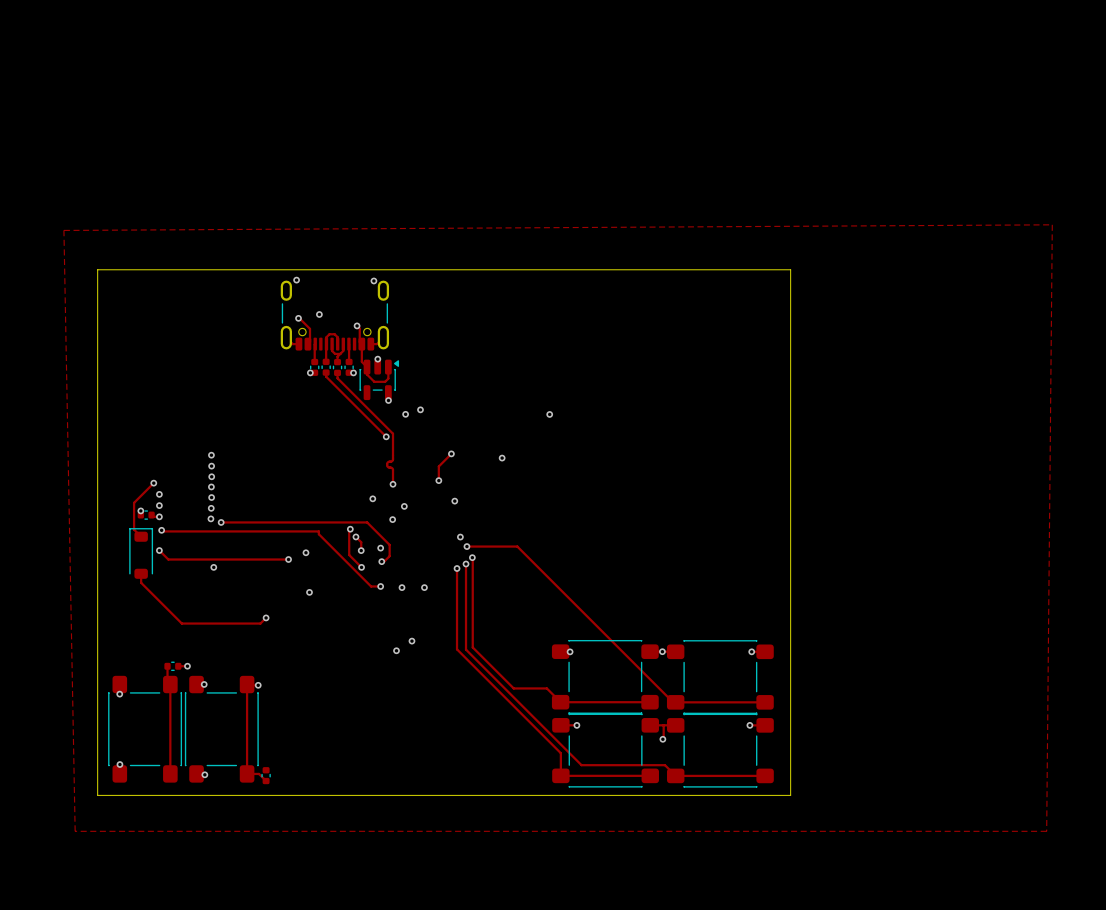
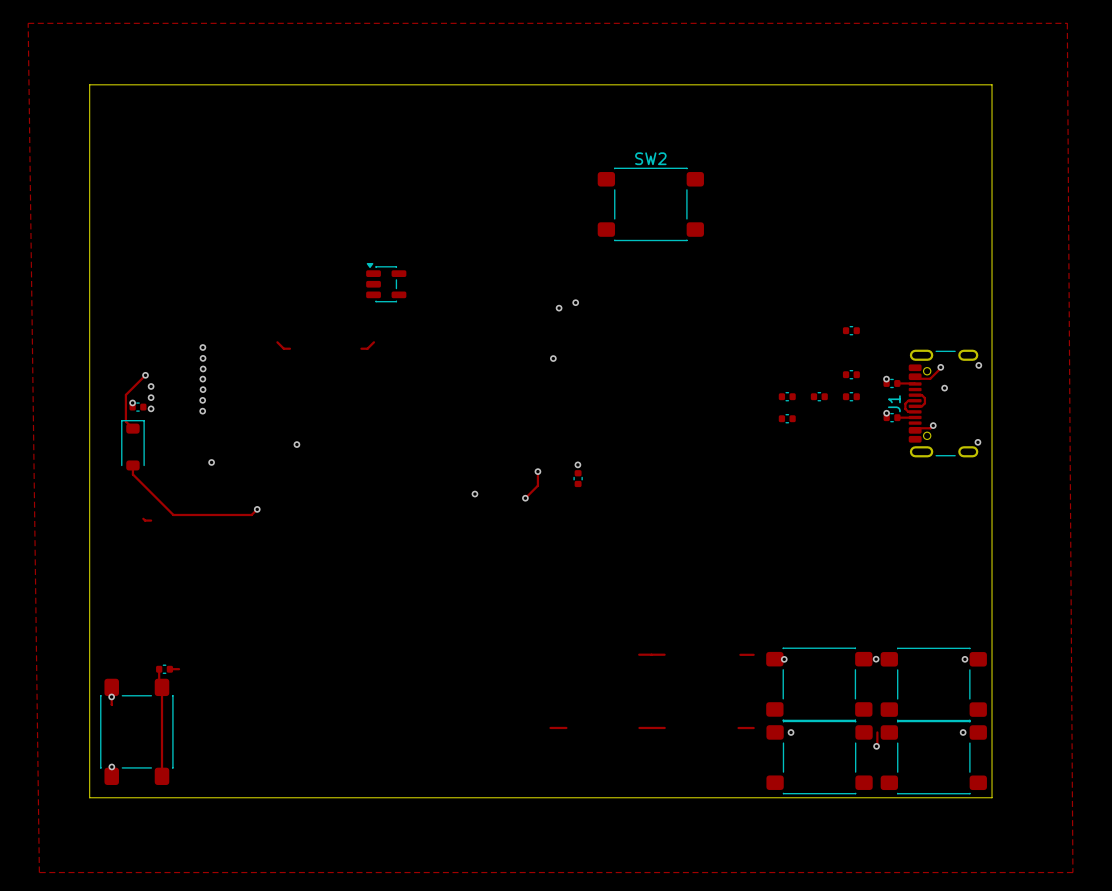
SW2: none -> (650, 204)
zone outline: (1052, 224) (63, 230) (75, 831) (1046, 831) (1052, 224) -> (28, 23) (39, 872) (1072, 872) (1067, 23) (28, 23)
board edge: (97, 269) (790, 269) (790, 795) -> (89, 274) (89, 84) (992, 84) (992, 797) (779, 797)
via: (296, 280) -> none
via: (373, 280) -> none
via: none -> (575, 302)
via: none -> (559, 308)
via: (319, 314) -> none
part: (334, 315) -> none
track: (298, 318) (310, 328) (310, 342) (307, 344) -> none
via: (298, 318) -> none
track: (357, 325) (359, 328) (359, 342) (361, 344) (361, 361) (367, 367) (367, 374) (374, 381) (385, 381) (388, 378) (388, 367) -> none
via: (357, 325) -> none
part: none -> (851, 330)
via: none -> (202, 347)
track: (315, 344) (314, 362) -> none
track: (332, 344) (332, 350) (335, 353) (340, 353) -> none
track: (337, 344) (337, 337) (334, 334) (329, 334) (326, 337) (326, 361) -> none
track: (343, 344) (343, 350) (337, 356) (337, 362) -> none
track: (348, 344) (349, 361) -> none
via: none -> (203, 358)
via: none -> (553, 358)
via: (377, 359) -> none
via: none -> (978, 365)
track: none -> (940, 367) (930, 378) (917, 378) (915, 376)
via: none -> (940, 367)
via: none -> (203, 368)
part: (314, 367) -> none
part: (326, 367) -> none
part: (337, 367) -> none
part: (349, 367) -> none
via: none -> (145, 375)
part: none -> (851, 374)
via: (310, 372) -> none
track: (326, 372) (326, 376) (386, 436) -> none
track: (337, 372) (337, 378) (393, 433) (392, 459) (387, 464) (387, 466) (392, 469) (393, 484) -> none
via: (353, 372) -> none
via: none -> (202, 379)
via: none -> (886, 379)
part rotation: 0° (379, 379) -> 90° counterclockwise (386, 282)
part position: (379, 379) -> (386, 282)
part: none -> (891, 383)
track: none -> (897, 383) (915, 383)
via: none -> (151, 386)
via: none -> (944, 388)
via: none -> (203, 389)
track: none -> (915, 395) (921, 395) (924, 398) (924, 403) (921, 406) (915, 406)
part: none -> (787, 396)
part: none -> (819, 396)
part: none -> (851, 396)
via: none -> (151, 397)
via: none -> (202, 400)
track: none -> (915, 400) (908, 400) (905, 403) (905, 408) (908, 411) (915, 411)
via: none -> (132, 402)
J1: none -> (943, 403)
via: (388, 400) -> none
part: none -> (137, 407)
via: none -> (151, 408)
via: none -> (202, 411)
via: none -> (886, 413)
via: (420, 409) -> none
part: none -> (892, 417)
track: none -> (915, 417) (897, 417)
via: (405, 414) -> none
via: (549, 414) -> none
part: none -> (787, 418)
track: none -> (933, 425) (930, 428) (917, 428) (915, 430)
via: none -> (933, 425)
via: (386, 436) -> none
via: none -> (977, 442)
via: none -> (296, 444)
track: (451, 453) (438, 466) (438, 480) -> none
via: (451, 453) -> none
via: (211, 455) -> none
via: none -> (211, 462)
via: (502, 458) -> none
via: none -> (577, 464)
via: (211, 466) -> none
track: none -> (537, 471) (537, 485) (525, 498)
via: none -> (537, 471)
part: none -> (578, 478)
via: (211, 476) -> none
via: (438, 480) -> none
track: (153, 483) (134, 502) (134, 529) (141, 536) -> (145, 375) (125, 394) (125, 421) (132, 428)
via: (153, 483) -> none
via: (393, 484) -> none
via: (211, 486) -> none
via: none -> (474, 494)
via: (159, 494) -> none
via: none -> (525, 498)
via: (211, 497) -> none
via: (372, 498) -> none
via: (454, 501) -> none
via: (159, 505) -> none
via: none -> (257, 509)
via: (404, 506) -> none
via: (211, 508) -> none
via: (140, 510) -> none
part: (146, 515) -> none
via: (159, 516) -> none
via: (210, 518) -> none
via: (392, 519) -> none
track: (221, 522) (367, 522) (389, 544) (389, 556) (381, 561) -> none
via: (221, 522) -> none
track: (350, 529) (349, 555) (361, 567) -> none
via: (350, 529) -> none
track: (161, 530) (318, 531) (318, 534) (371, 586) (380, 586) -> none
via: (161, 530) -> none
track: (355, 536) (361, 542) (361, 550) -> none
via: (355, 536) -> none
via: (460, 537) -> none
via: (466, 546) -> none
via: (380, 548) -> none
track: (468, 548) (466, 546) (517, 546) (673, 702) (765, 702) -> none
track: (159, 550) (168, 559) (288, 559) -> none
via: (159, 550) -> none
via: (361, 550) -> none
via: (305, 552) -> none
part position: (141, 553) -> (132, 445)
track: (472, 557) (472, 647) (513, 688) (546, 688) (560, 702) (650, 702) -> none
via: (472, 557) -> none
via: (288, 559) -> none
via: (381, 561) -> none
track: (466, 564) (466, 649) (581, 765) (664, 765) (675, 775) (765, 775) -> none
via: (466, 564) -> none
via: (213, 567) -> none
via: (361, 567) -> none
track: (457, 568) (457, 649) (560, 753) (560, 775) (650, 775) -> none
via: (457, 568) -> none
track: (141, 573) (141, 582) (181, 623) (260, 623) (266, 617) -> (132, 465) (132, 474) (173, 514) (251, 514) (257, 509)
via: (380, 586) -> none
via: (401, 587) -> none
via: (424, 587) -> none
via: (309, 592) -> none
via: (266, 617) -> none
via: (411, 641) -> none
via: (396, 650) -> none
via: (570, 651) -> none
via: (662, 651) -> none
via: (751, 651) -> none
via: none -> (784, 659)
via: none -> (876, 659)
via: none -> (964, 659)
via: (187, 666) -> none
part: (605, 676) -> none
part: (720, 677) -> none
part: none -> (819, 684)
part: none -> (933, 684)
via: (204, 684) -> none
track: (258, 685) (247, 684) (247, 773) (259, 773) (266, 781) -> none
via: (258, 685) -> none
track: none -> (111, 696) (111, 704)
via: (576, 725) -> none
track: (663, 725) (662, 739) -> (877, 732) (876, 746)
via: (749, 725) -> none
part: (221, 729) -> none
via: none -> (791, 732)
via: none -> (963, 732)
via: (662, 739) -> none
via: none -> (876, 746)
part: (605, 750) -> none
part: (720, 750) -> none
part: none -> (819, 757)
part: none -> (933, 757)
via: (204, 774) -> none
part: (266, 775) -> none

